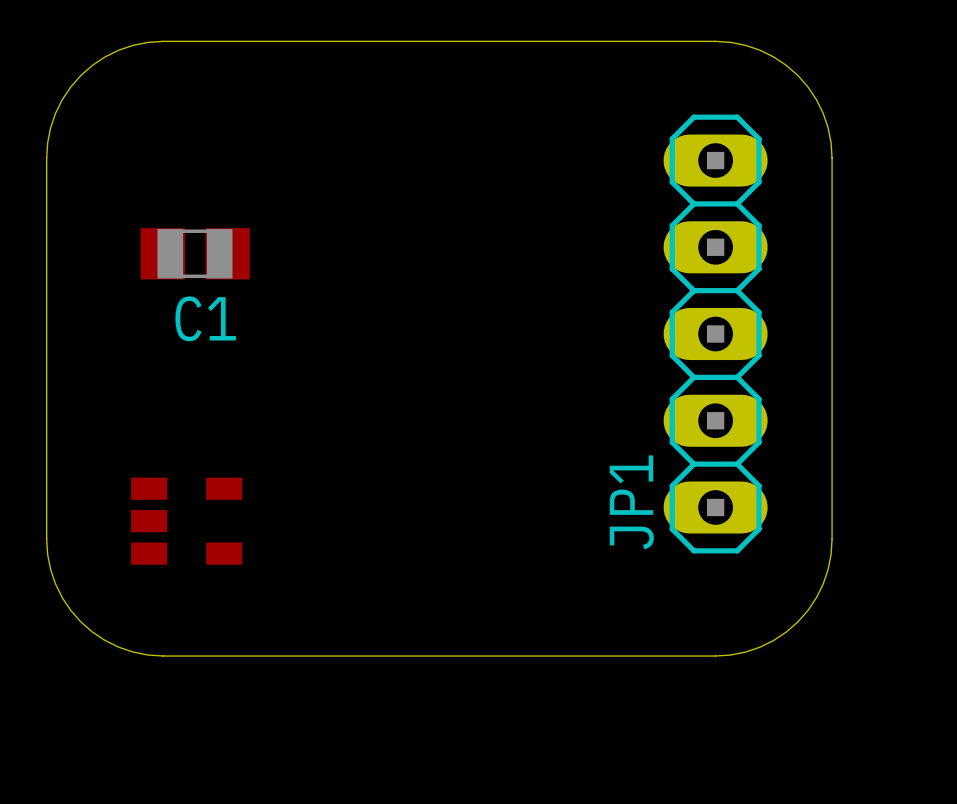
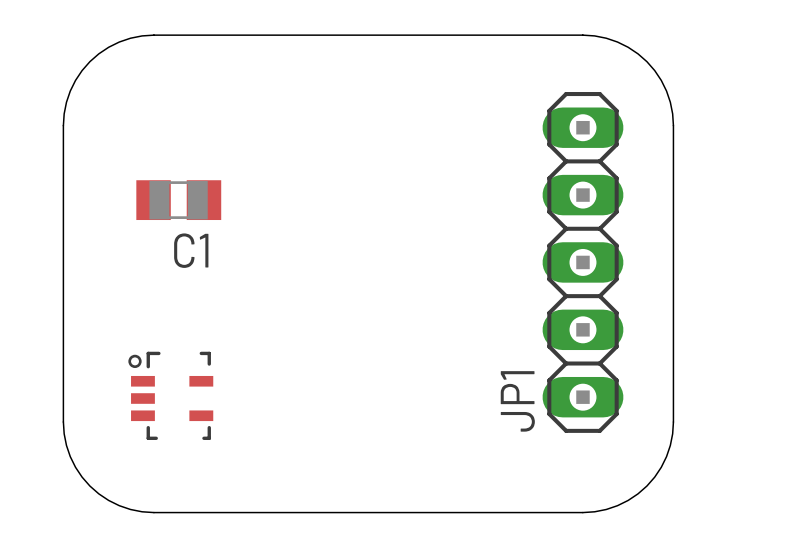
part footprint: [131, 477, 243, 565] -> [128, 351, 214, 440]

